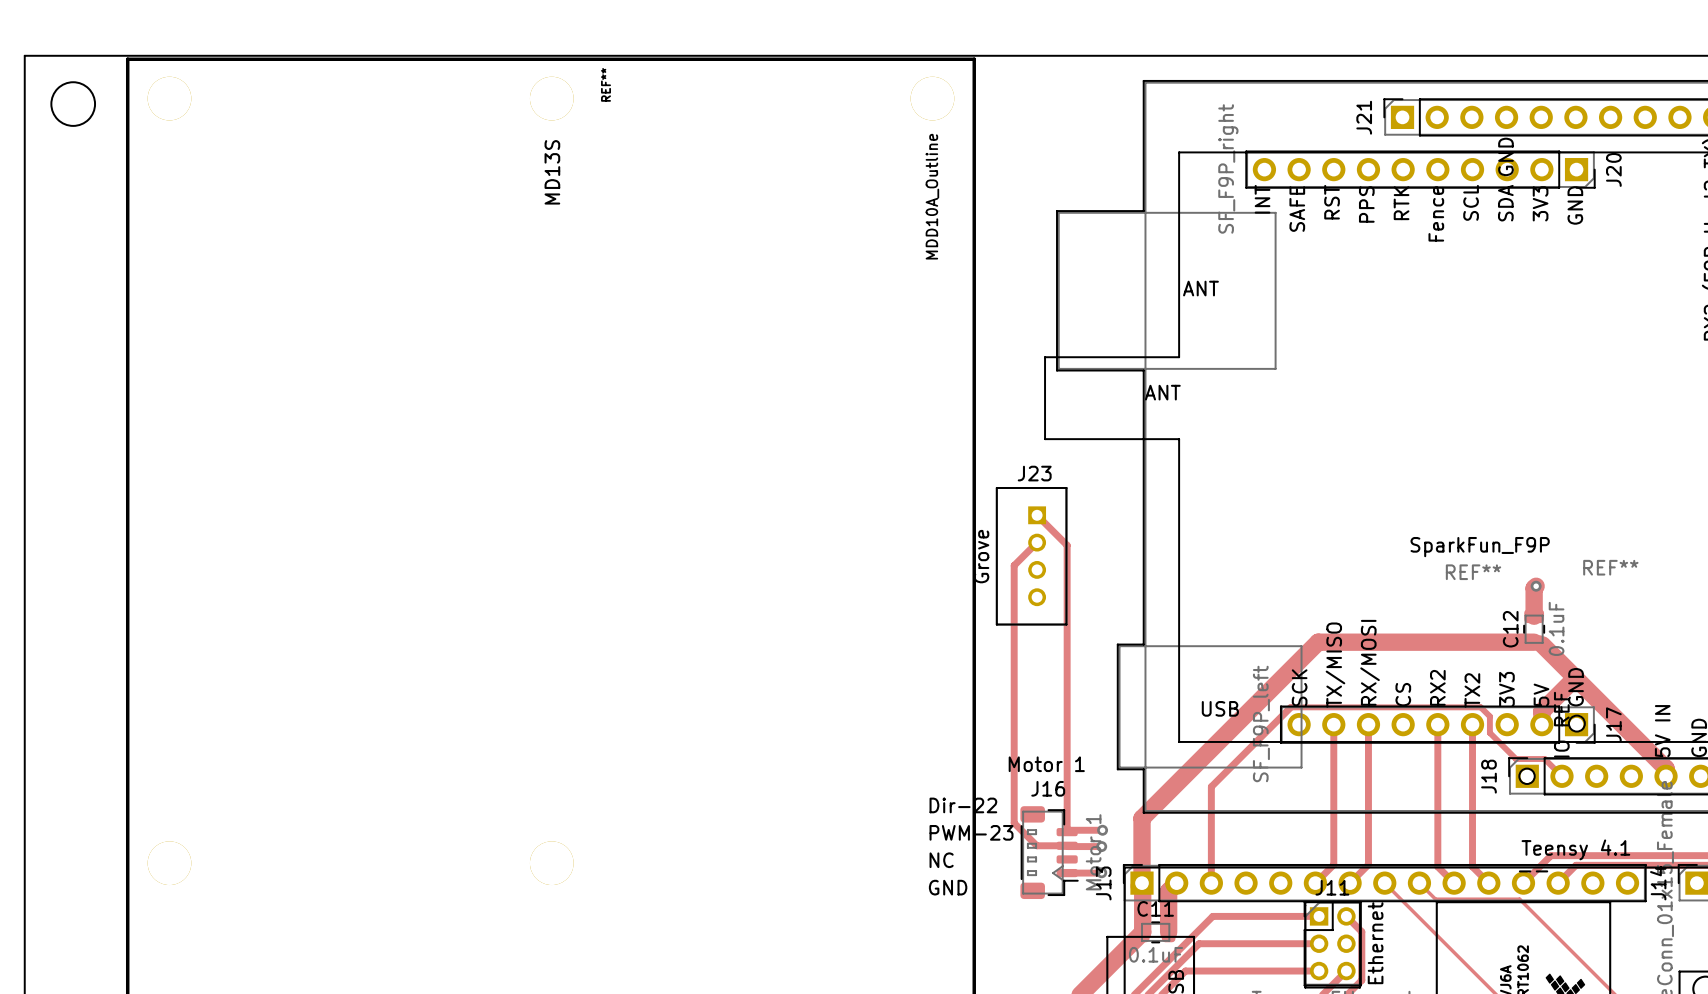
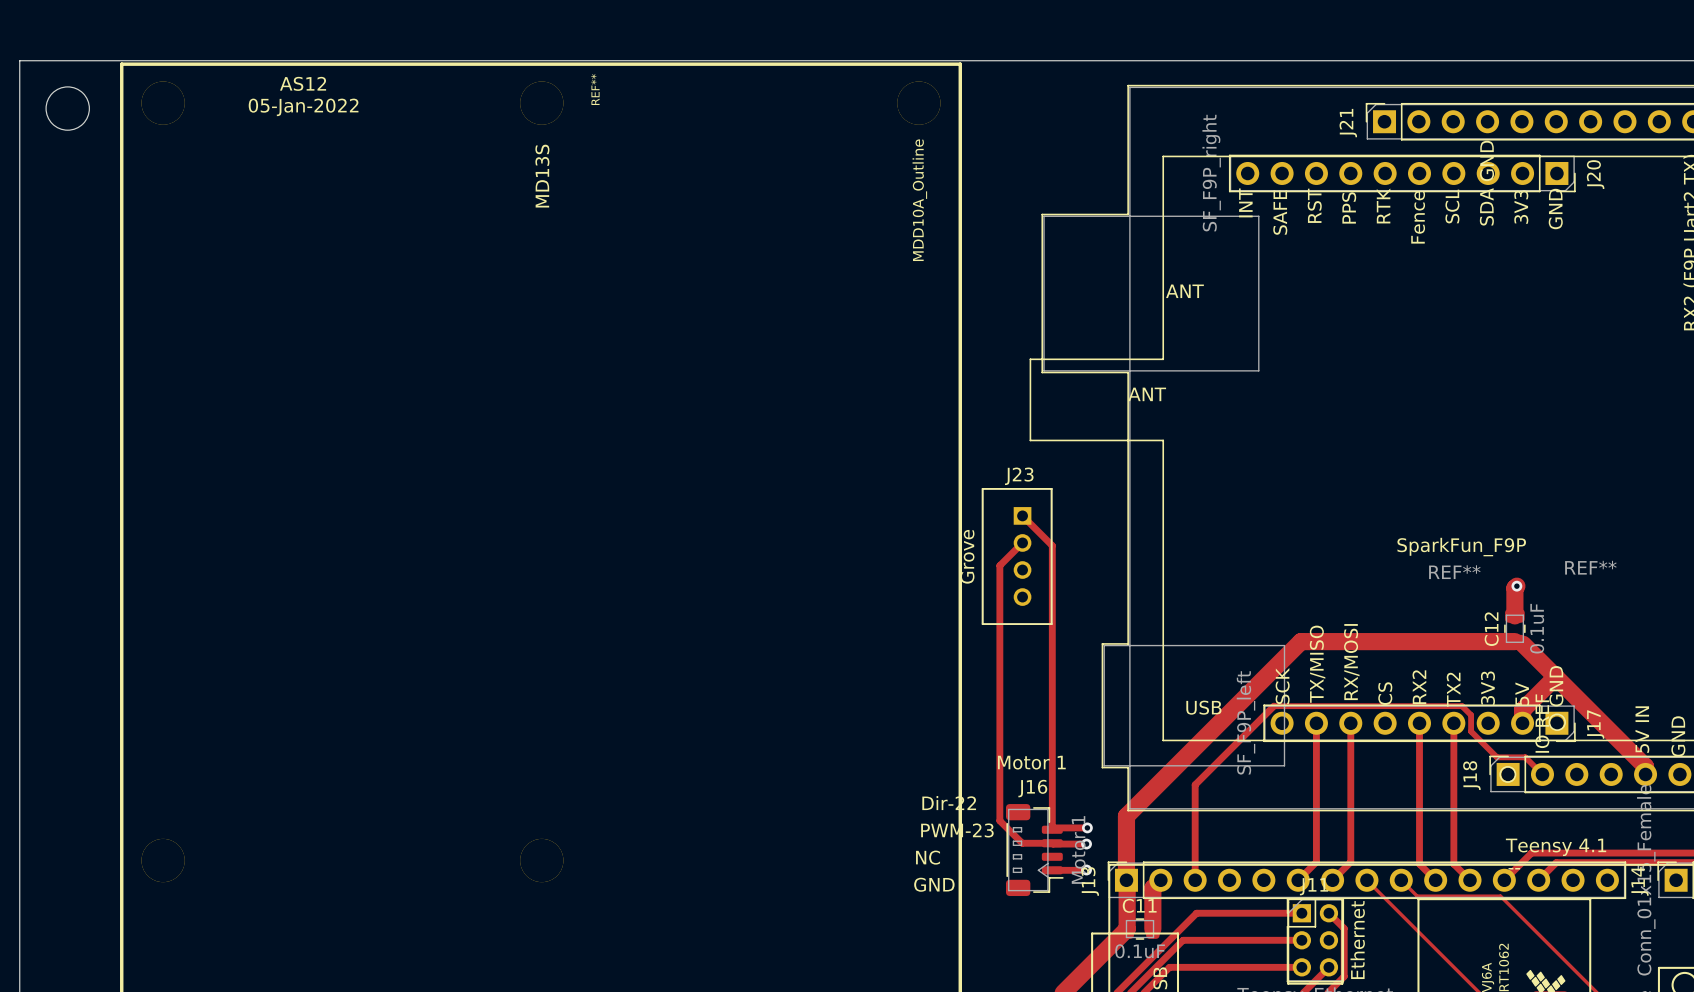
text: none -> AS12 (303, 83)
text: none -> 05-Jan-2022 (303, 107)

